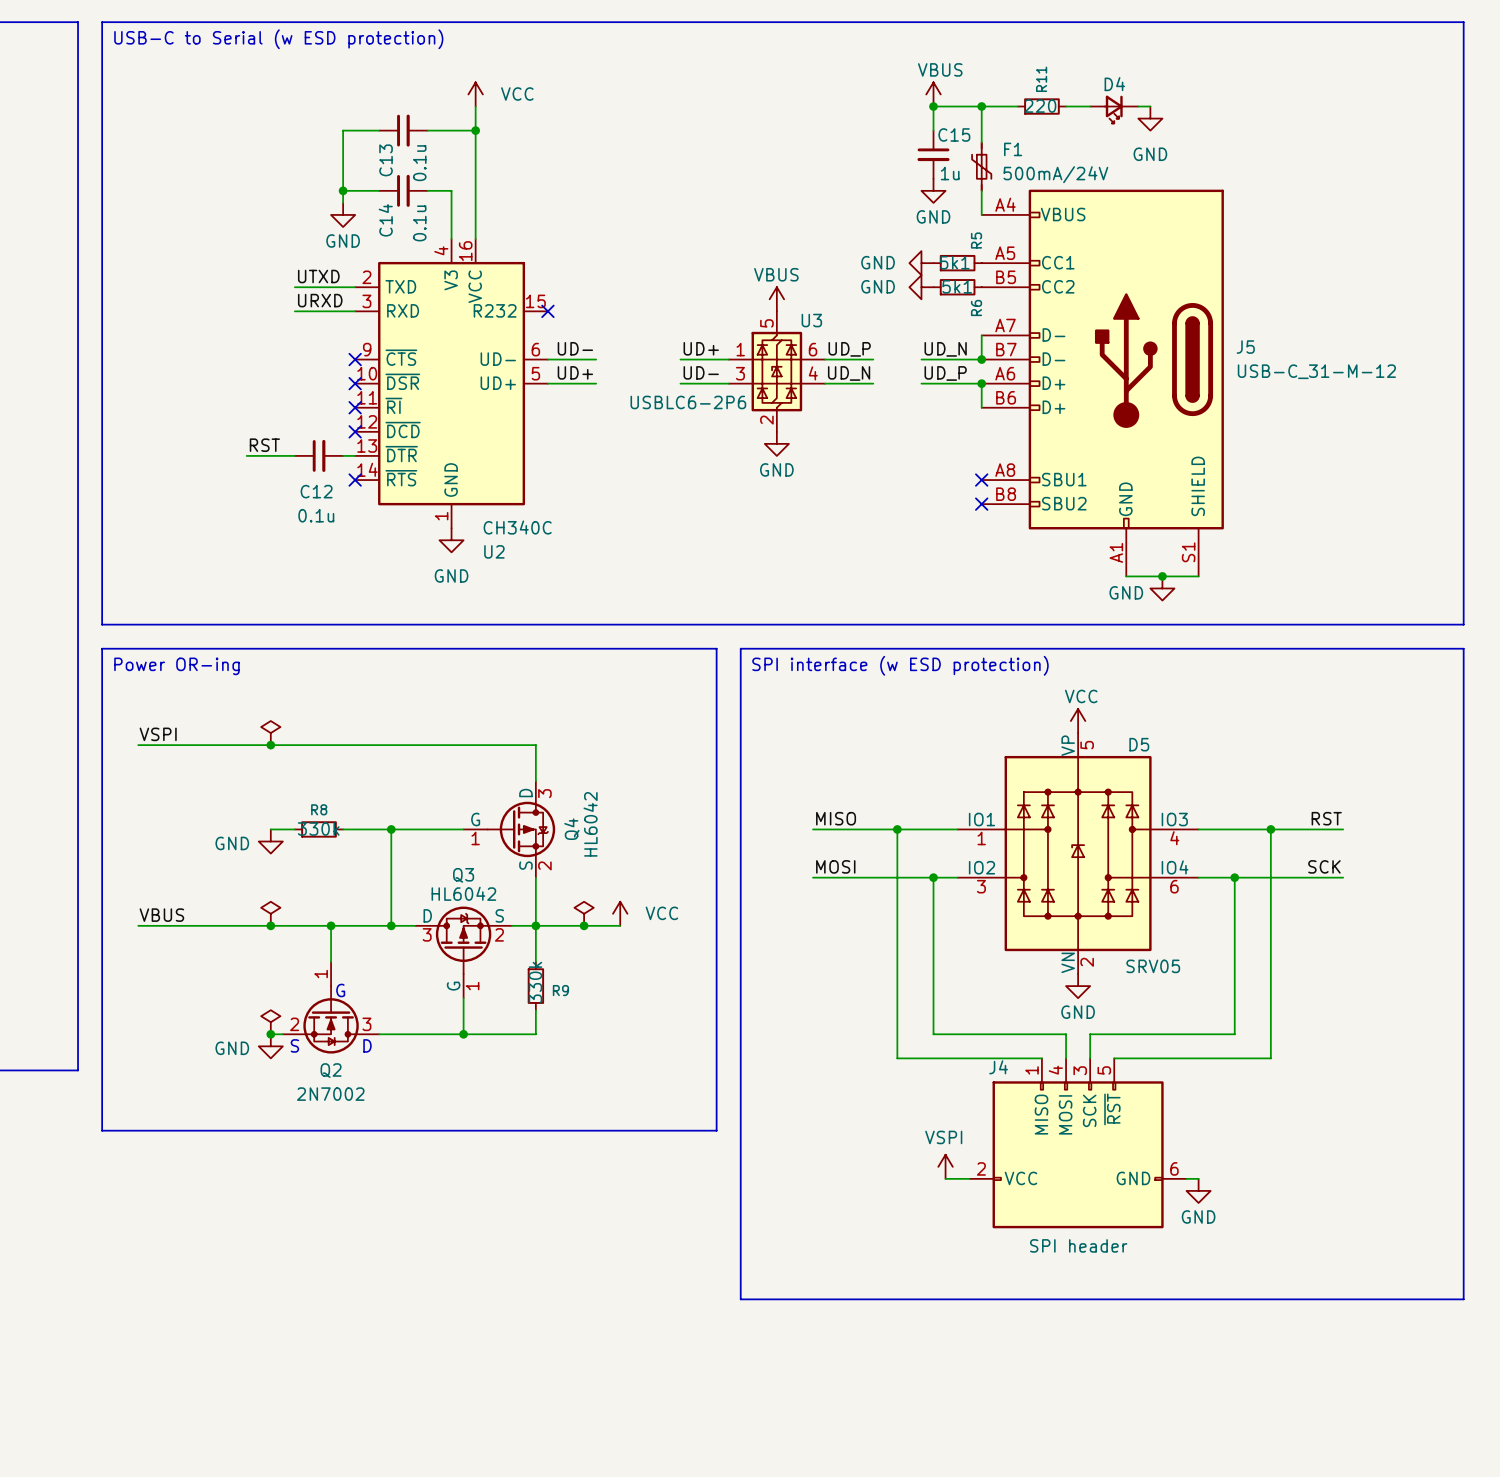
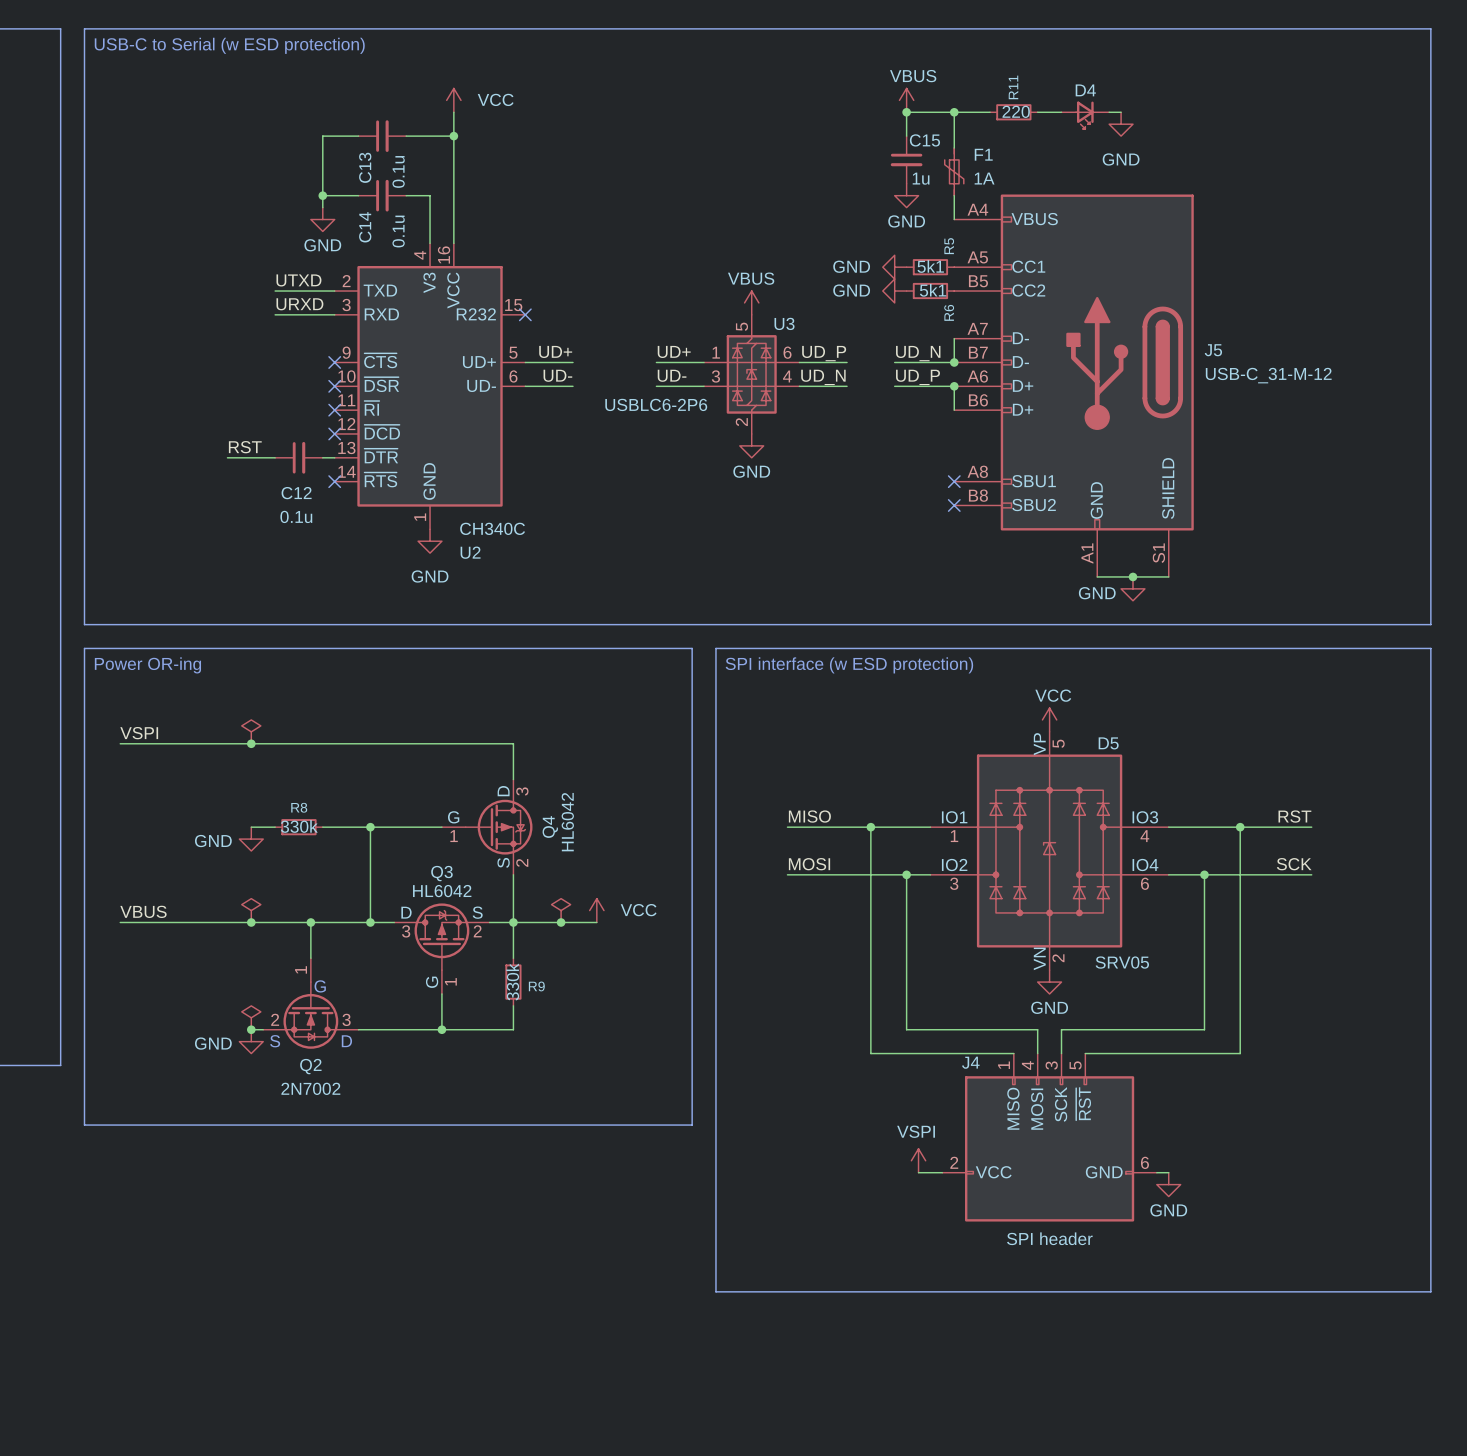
F1 value: 500mA/24V (1055, 174) -> 1A (984, 178)
label: UD- (575, 348) -> UD+ (555, 351)
U2 pin number: 6 (535, 349) -> 5 (513, 352)
U2 pin name: UD- (498, 359) -> UD+ (479, 362)
label: UD+ (575, 372) -> UD- (557, 375)
U2 pin number: 5 (535, 373) -> 6 (513, 376)
U2 pin name: UD+ (498, 383) -> UD- (481, 385)

